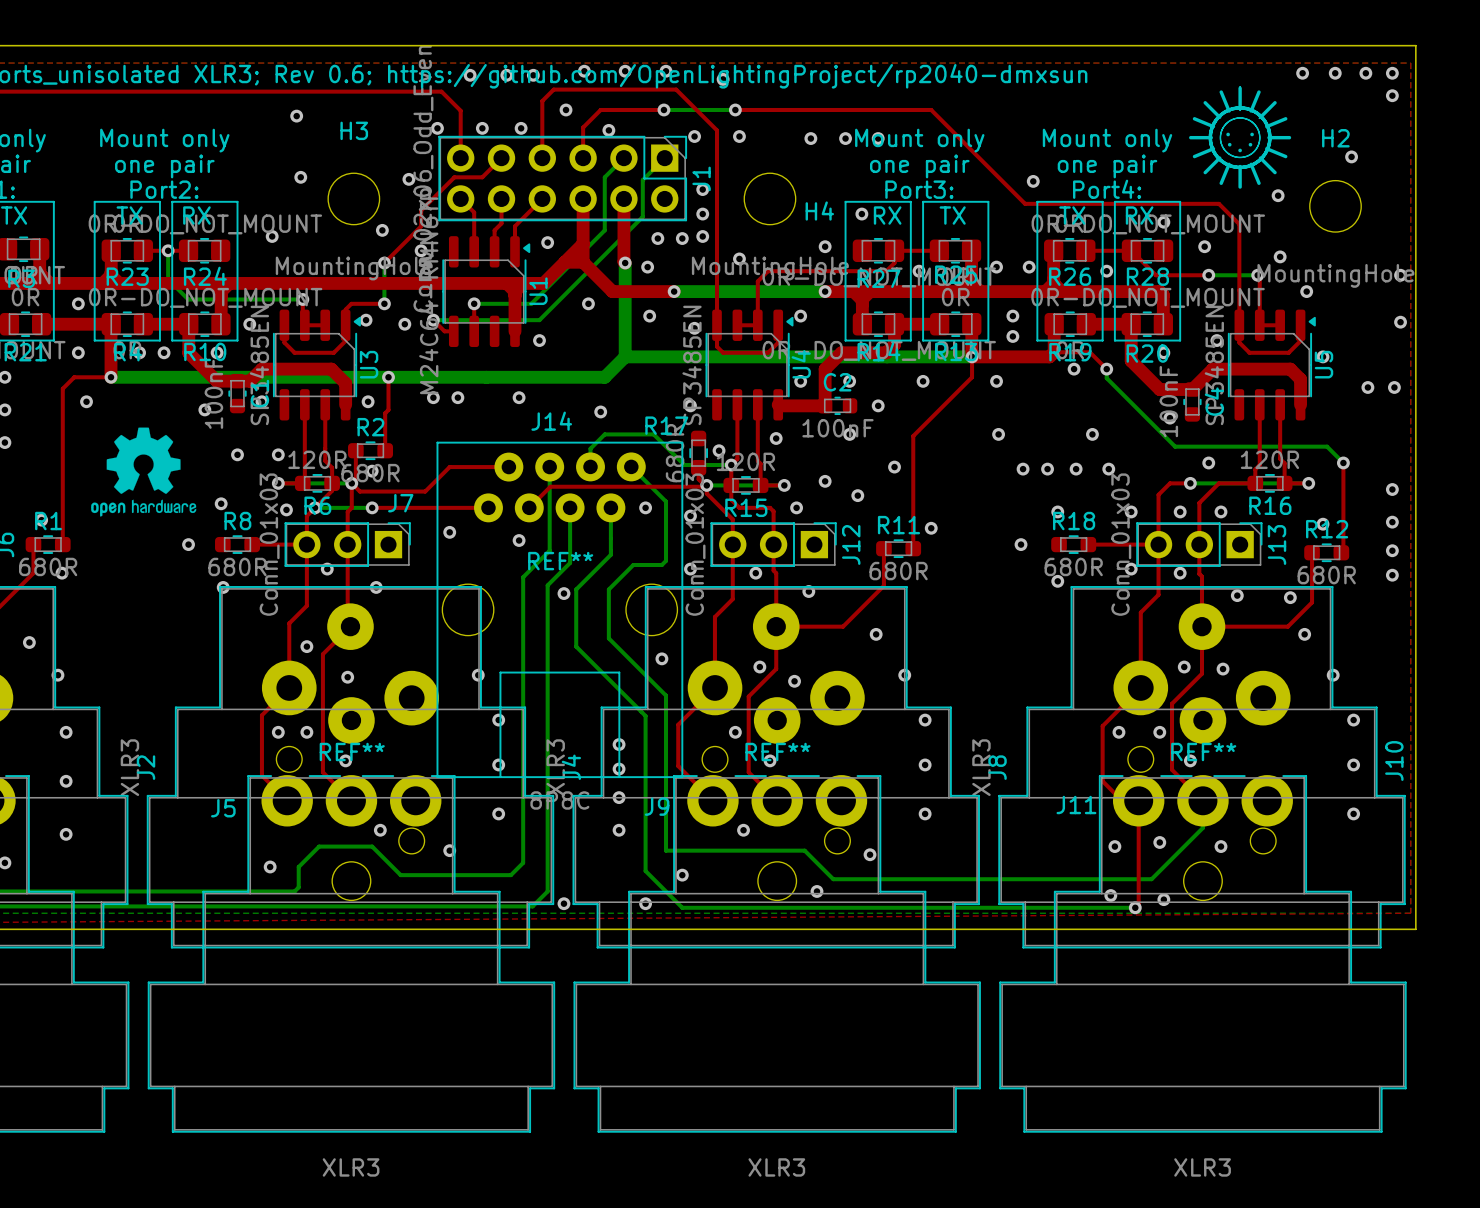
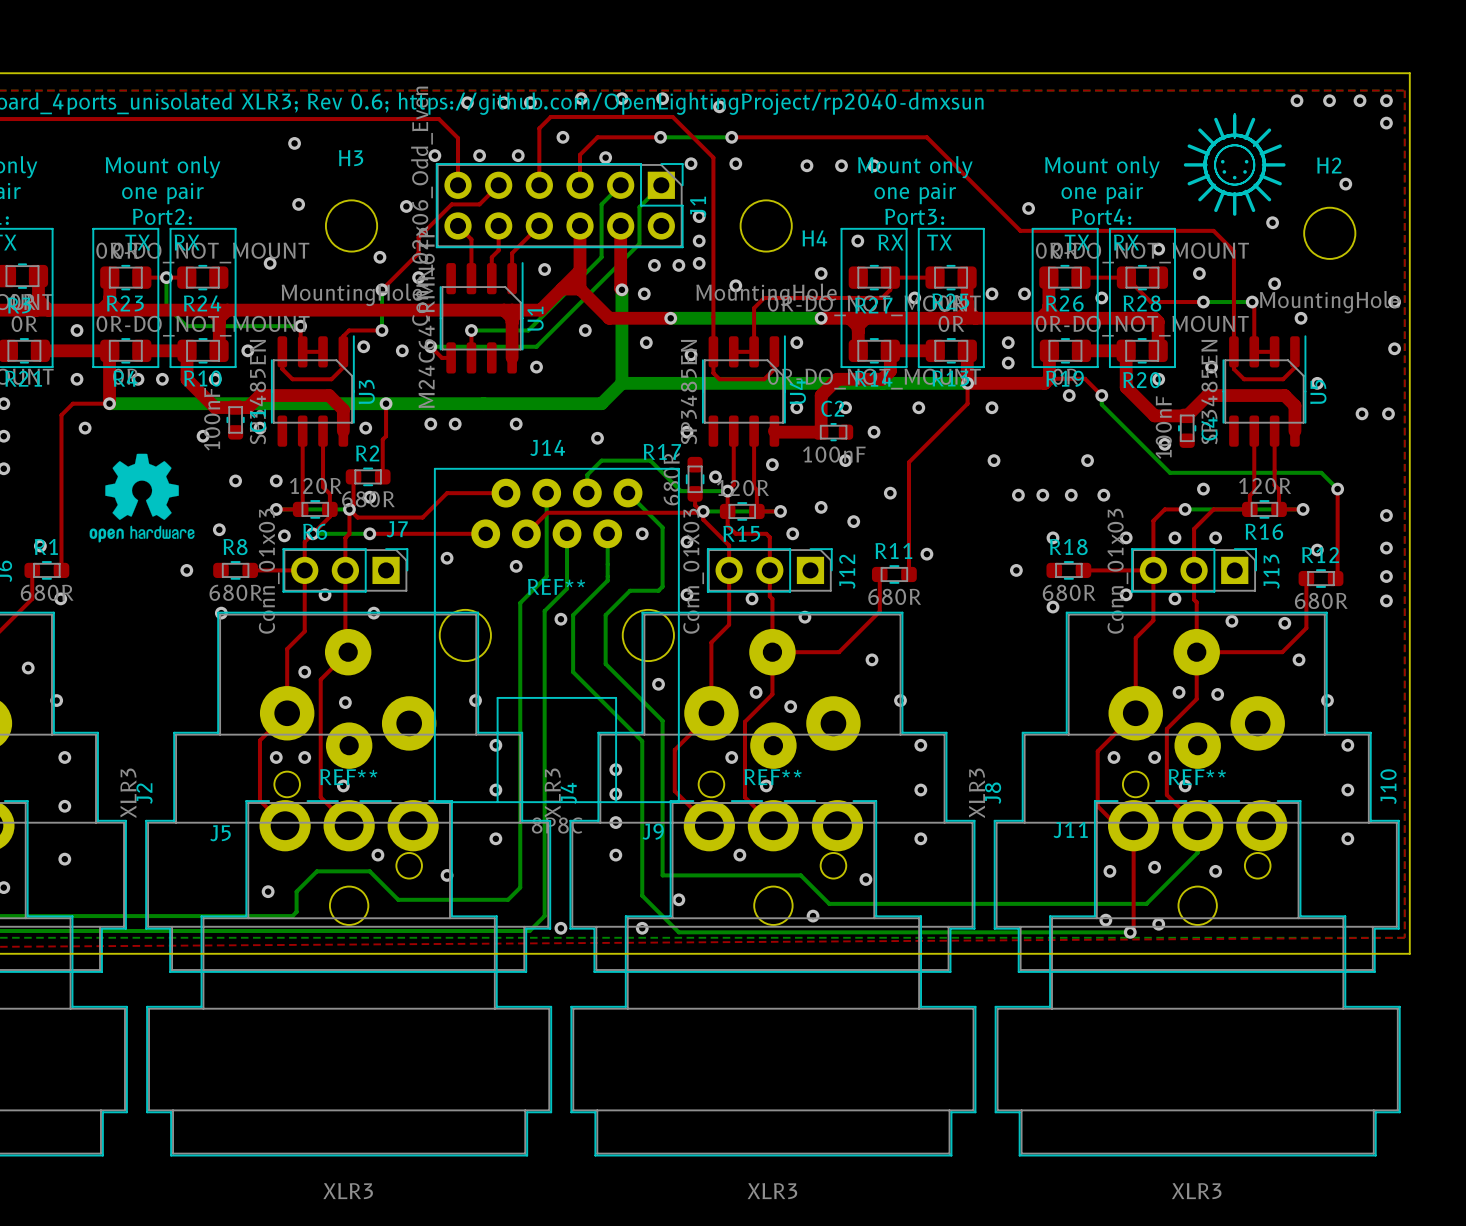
U1 footprint: [442, 236, 531, 348] -> [439, 262, 524, 374]
U3 footprint: [272, 309, 361, 421] -> [270, 335, 355, 447]
U4 footprint: [705, 309, 794, 421] -> [701, 335, 786, 447]
U5 footprint: [1227, 309, 1316, 421] -> [1222, 335, 1307, 447]

